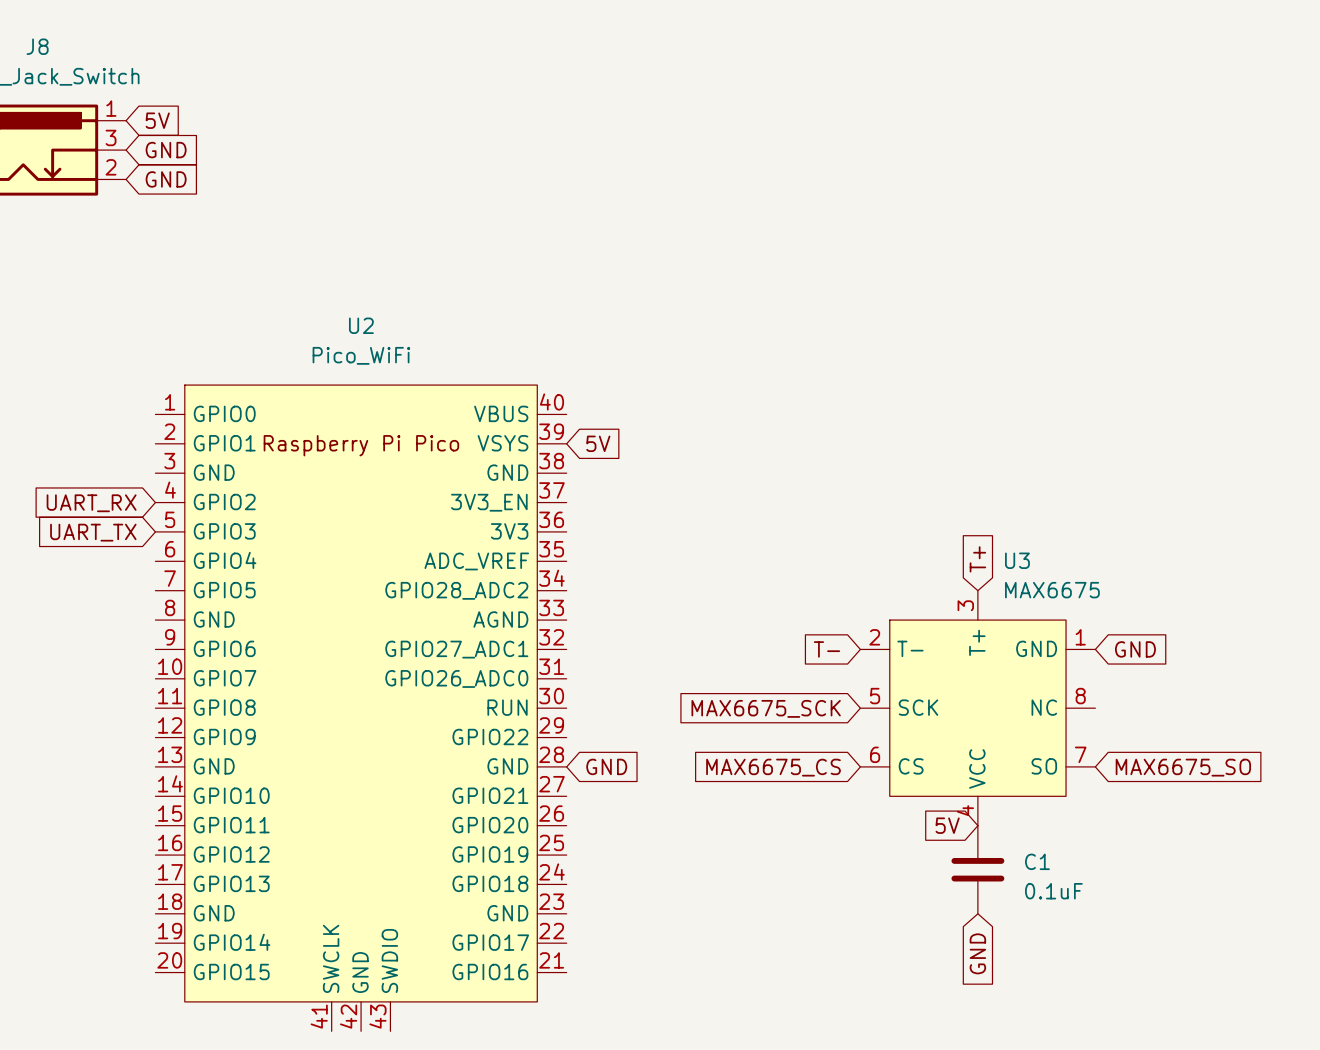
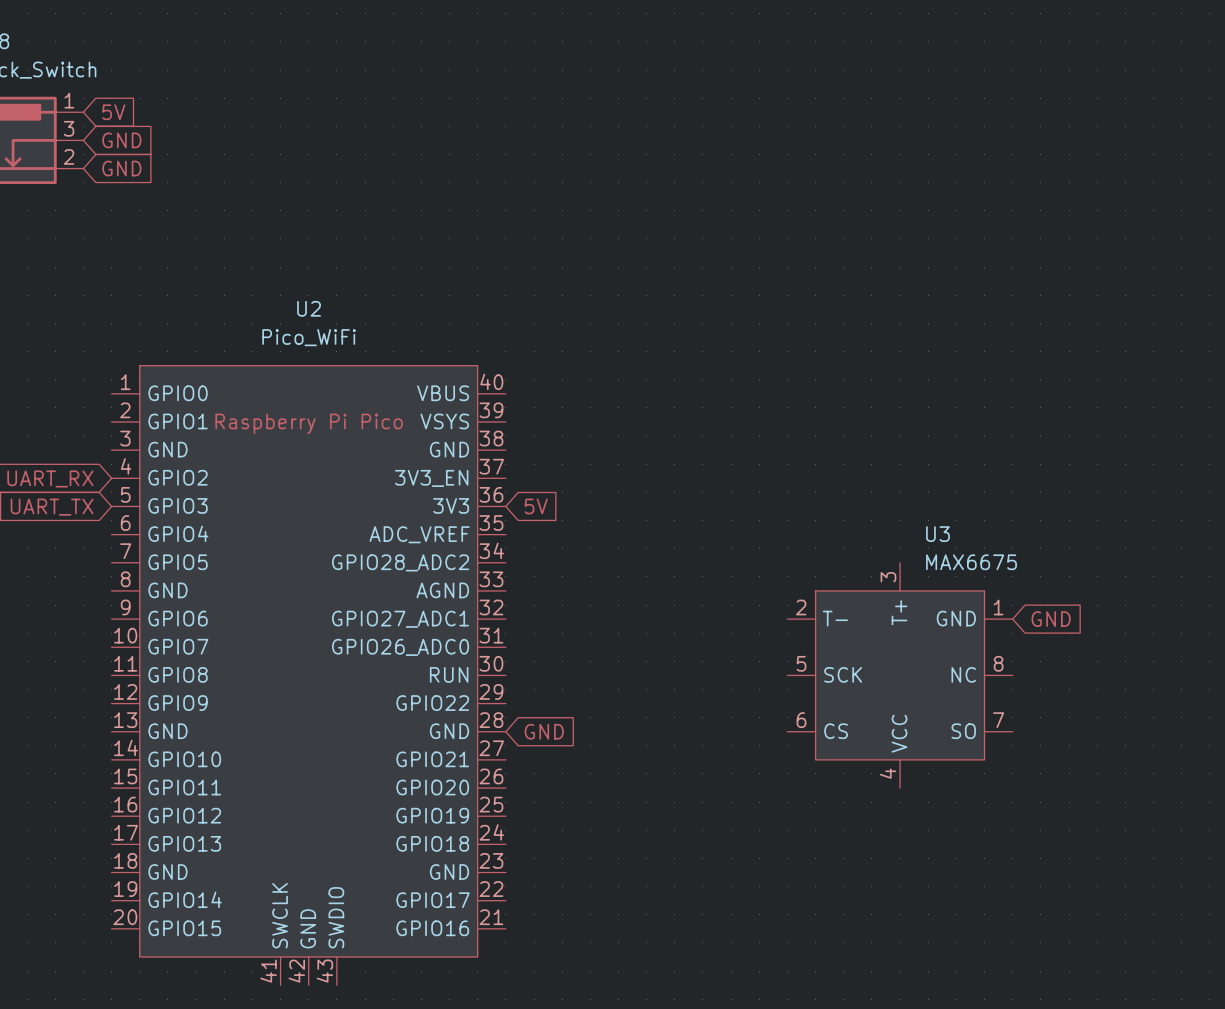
global label position: 5V (598, 443) -> 5V (536, 506)
global label: T+ (977, 559) -> none
global label: T- (826, 649) -> none
global label: MAX6675_SCK (766, 708) -> none
global label: MAX6675_CS (773, 767) -> none
global label: MAX6675_SO (1183, 767) -> none
global label: 5V (947, 825) -> none
C1: 0.1uF (977, 869) -> none
global label: GND (977, 953) -> none

